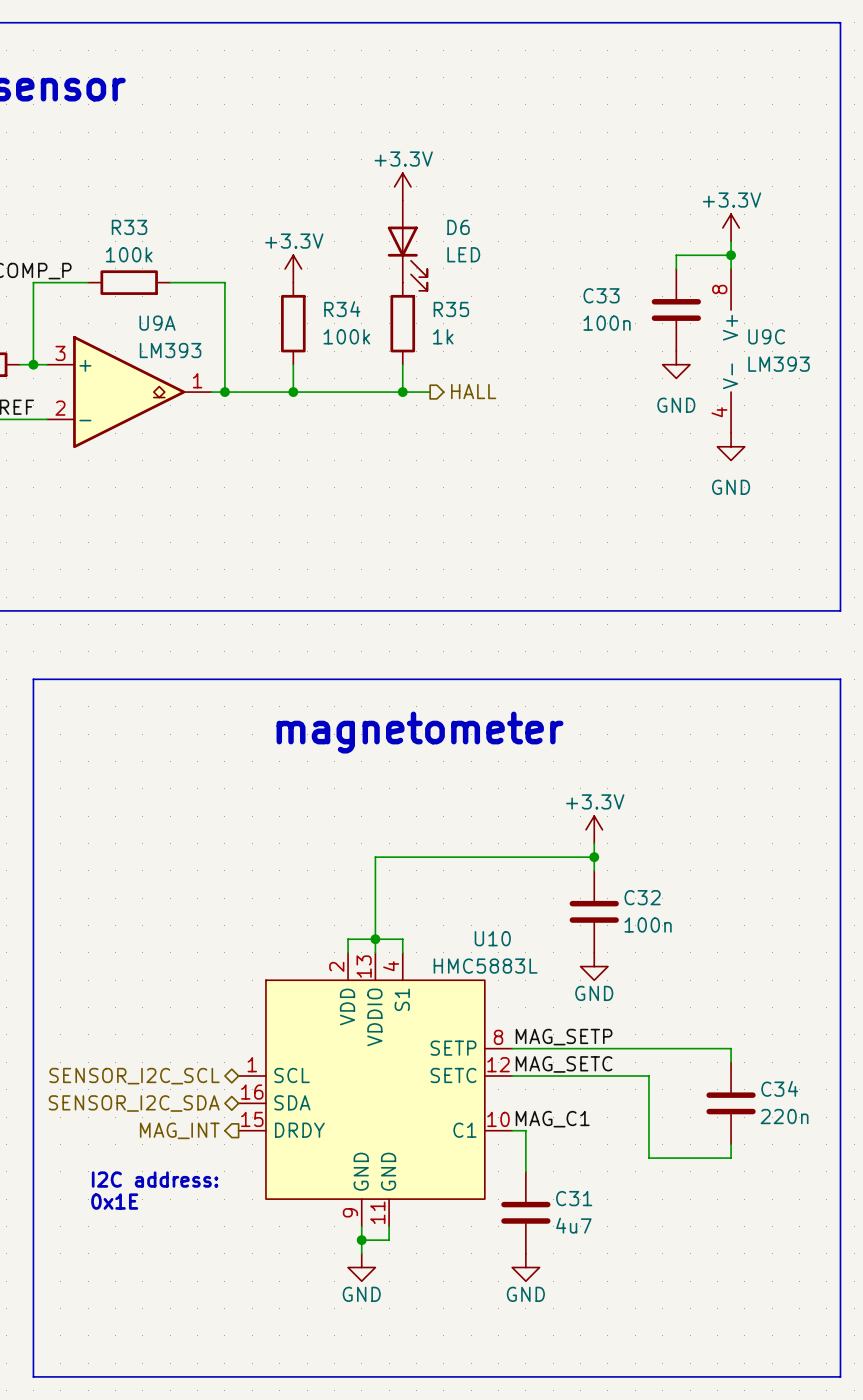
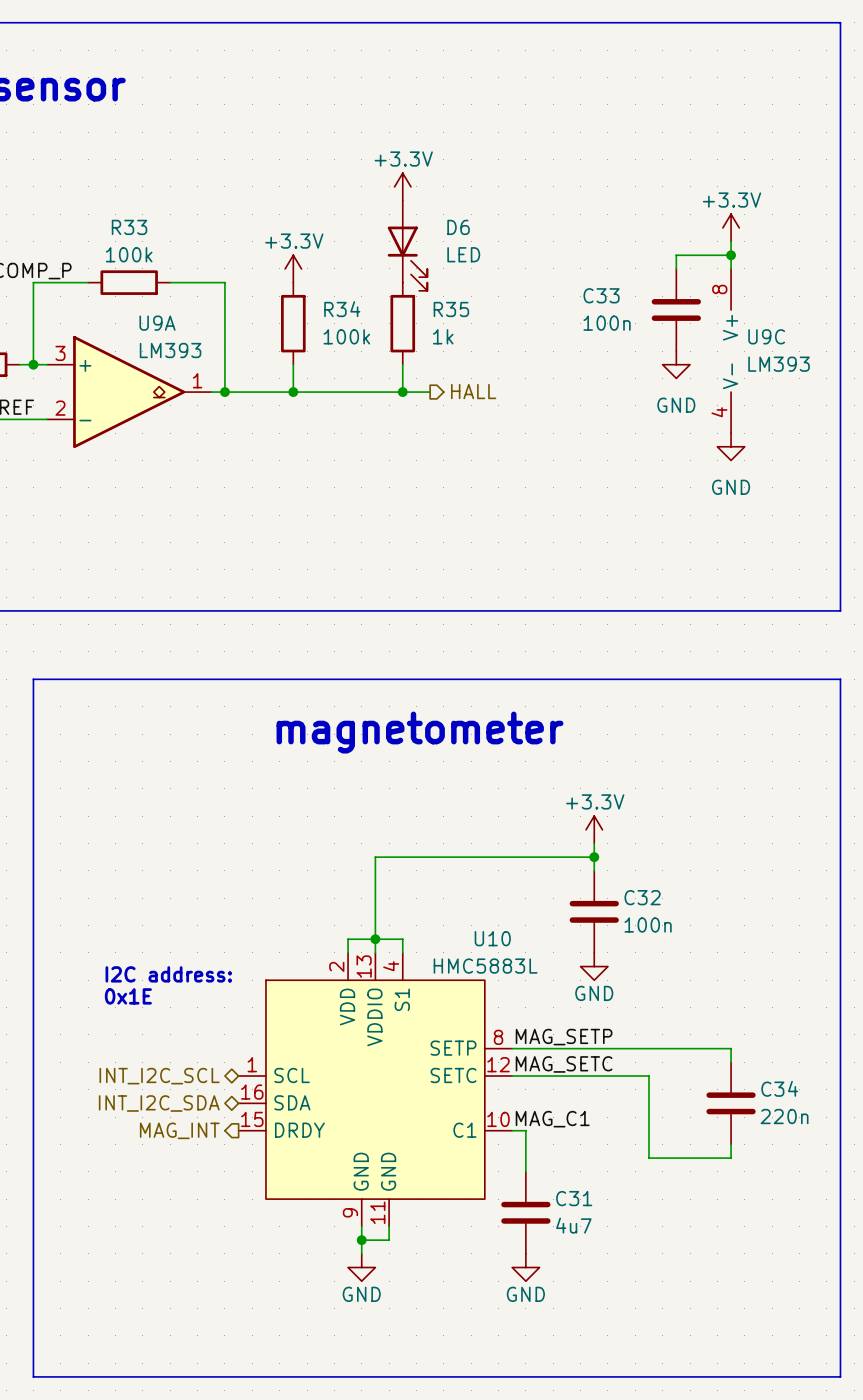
hierarchical label: SENSOR_I2C_SCL (134, 1076) -> INT_I2C_SCL (159, 1076)
hierarchical label: SENSOR_I2C_SDA (134, 1103) -> INT_I2C_SDA (159, 1103)
text position: I2C address: (155, 1179) -> I2C address: (168, 974)
text position: 0x1E (114, 1201) -> 0x1E (128, 996)

